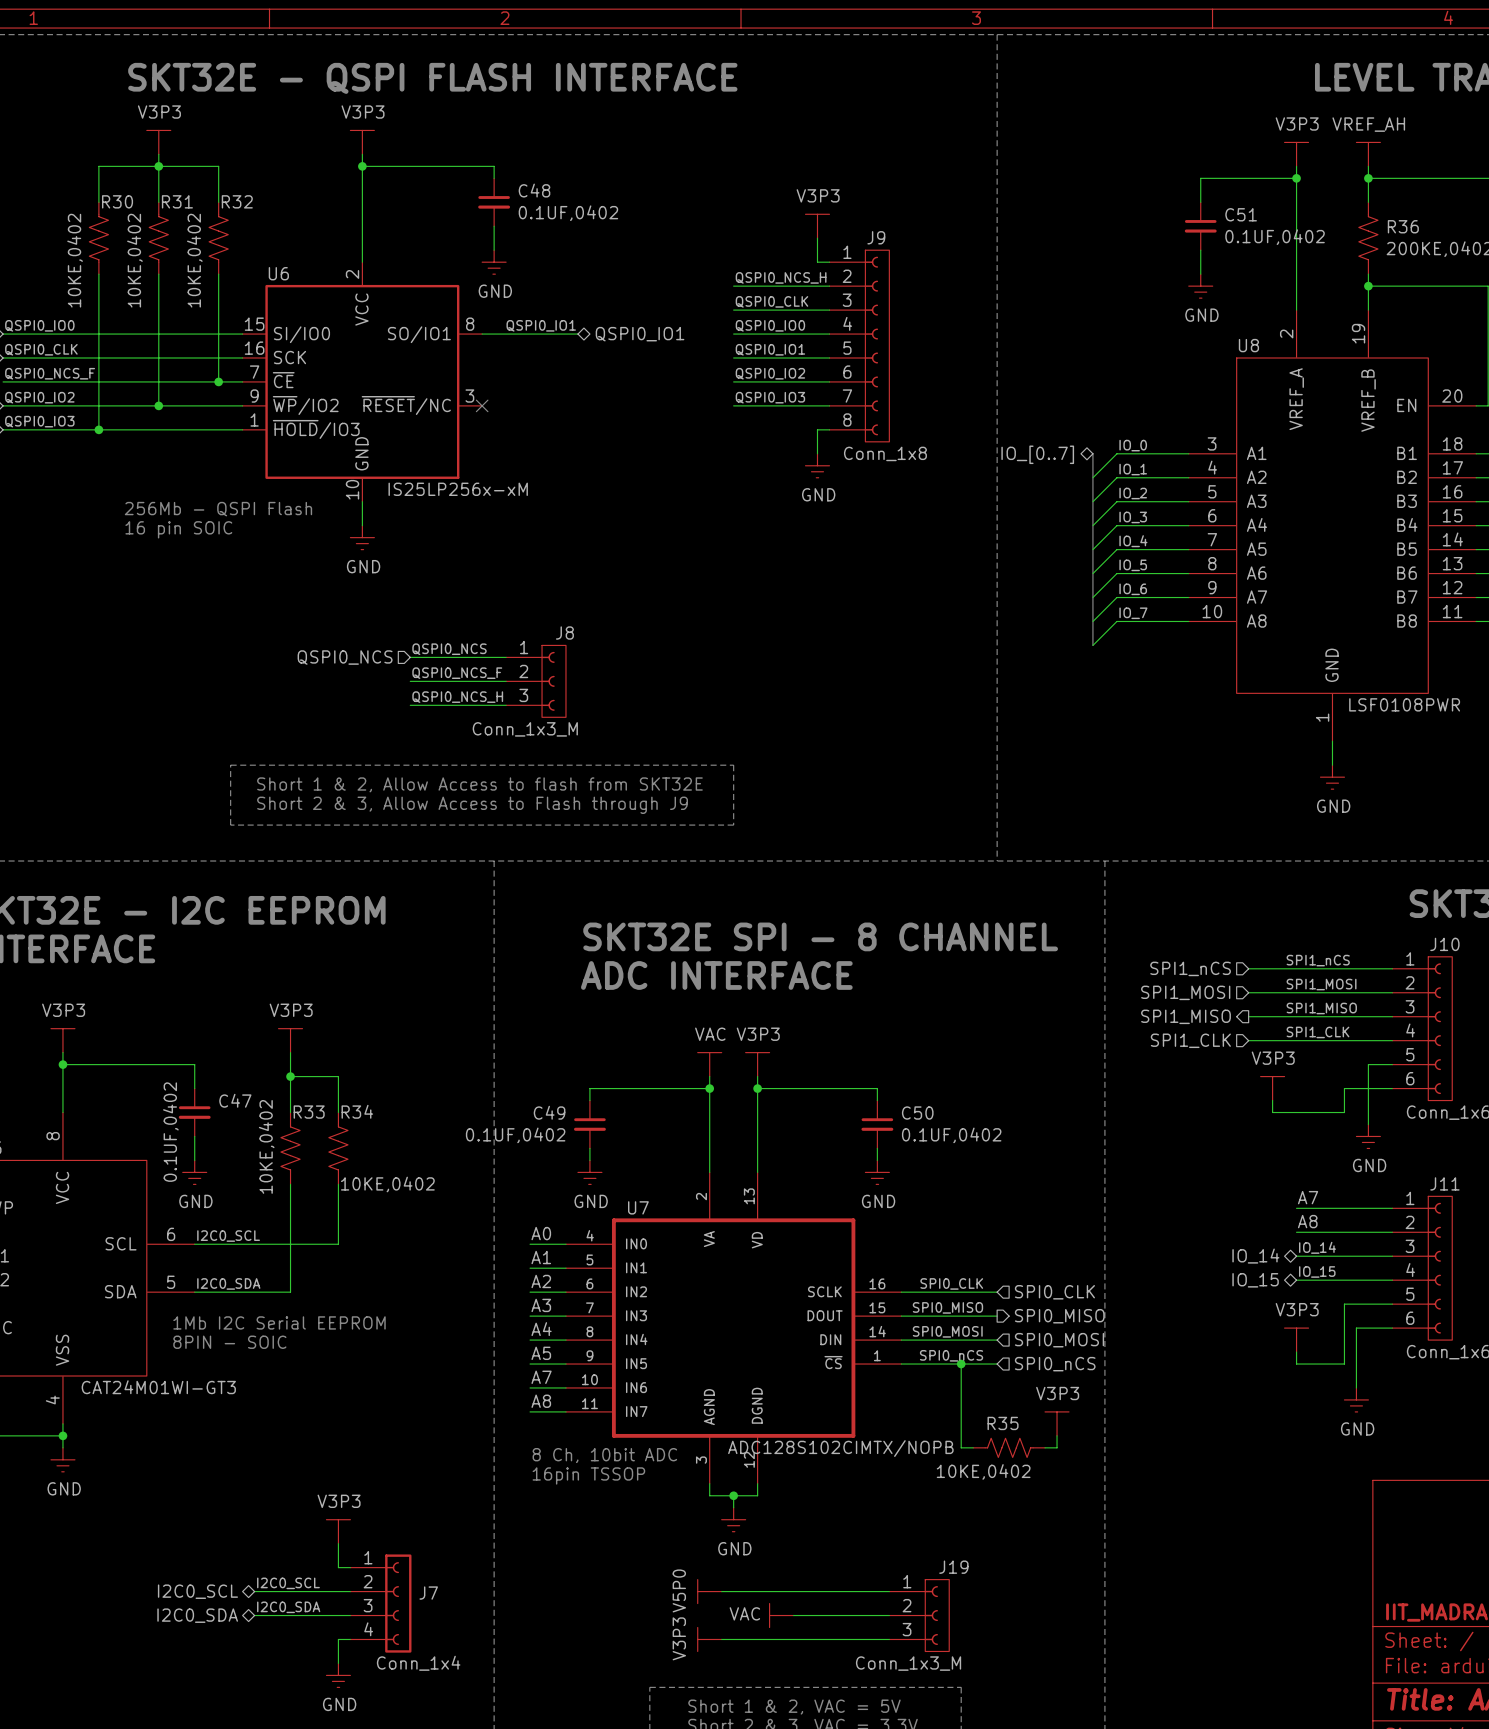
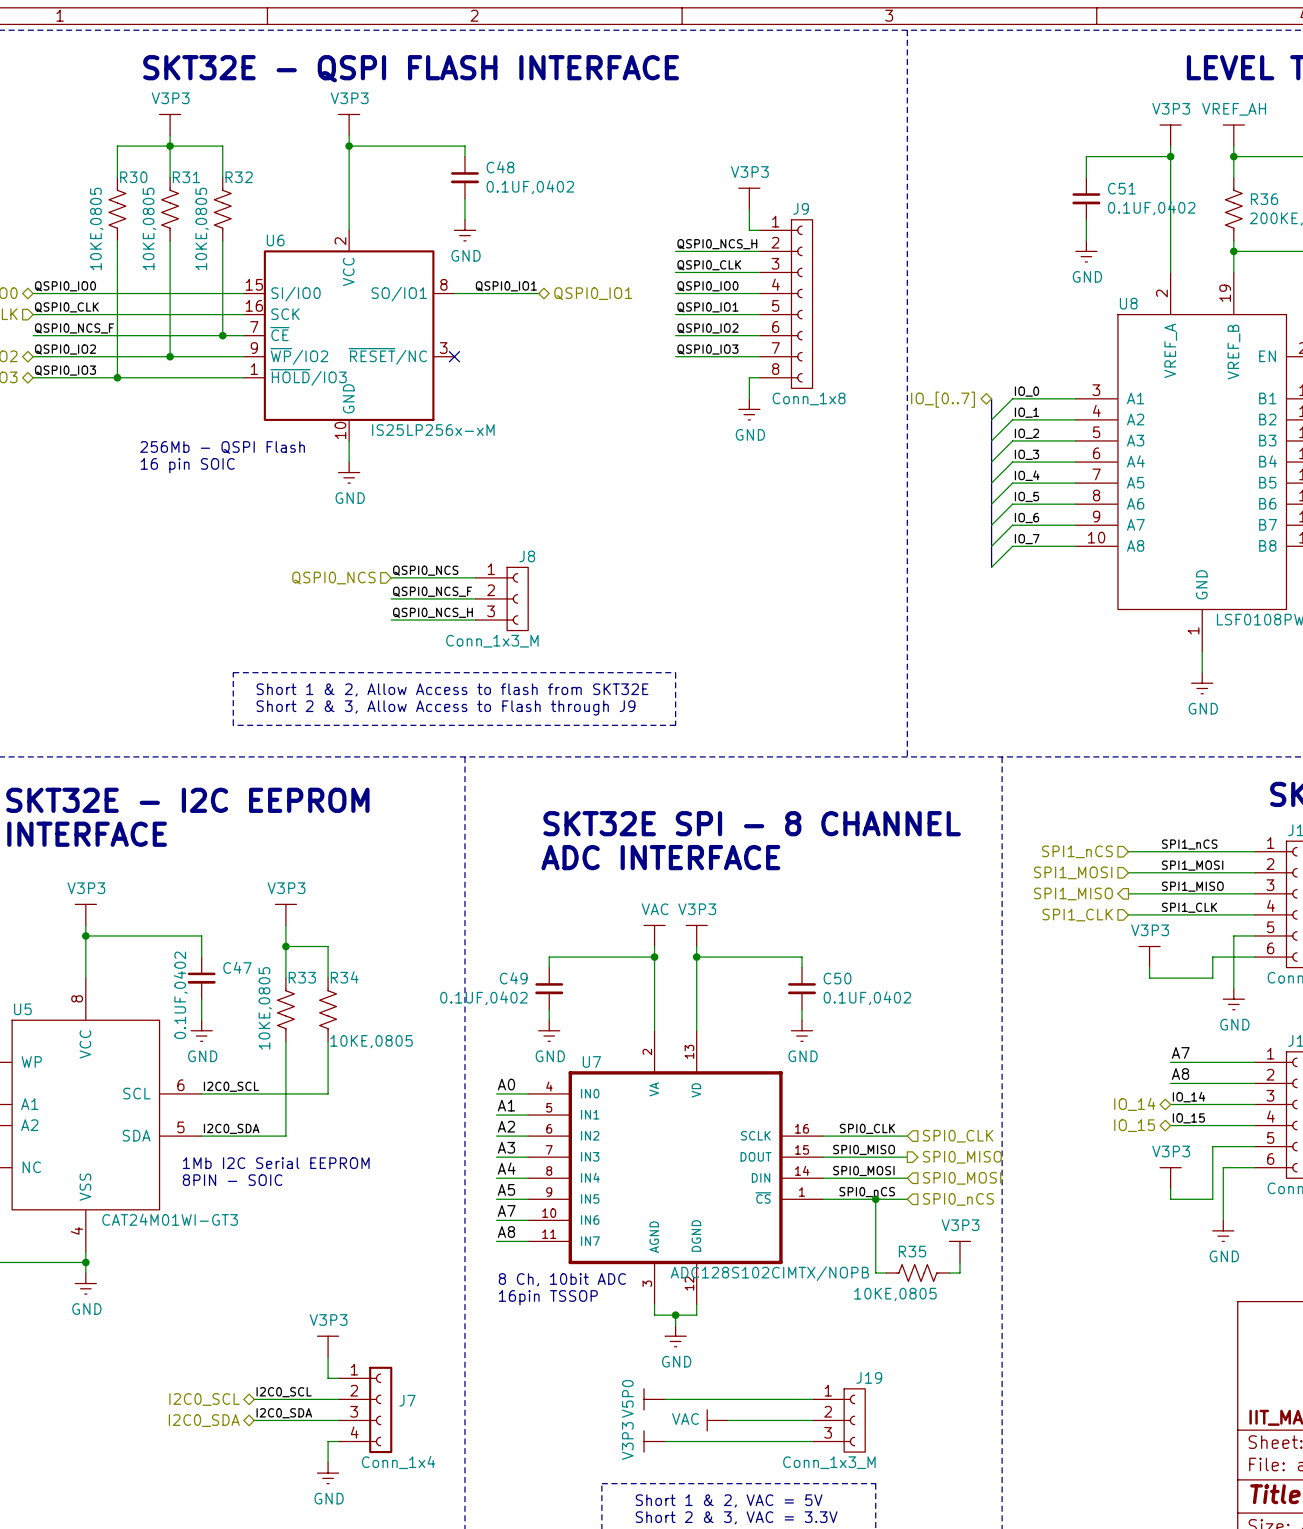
R30 value: 10KE,0402 (75, 260) -> 10KE,0805 (96, 229)
R31 value: 10KE,0402 (134, 260) -> 10KE,0805 (149, 229)
R32 value: 10KE,0402 (194, 260) -> 10KE,0805 (202, 229)
R33 value: 10KE,0402 (266, 1146) -> 10KE,0805 (265, 1008)
R34 value: 10KE,0402 (387, 1184) -> 10KE,0805 (371, 1041)
R35 value: 10KE,0402 (983, 1471) -> 10KE,0805 (895, 1294)

